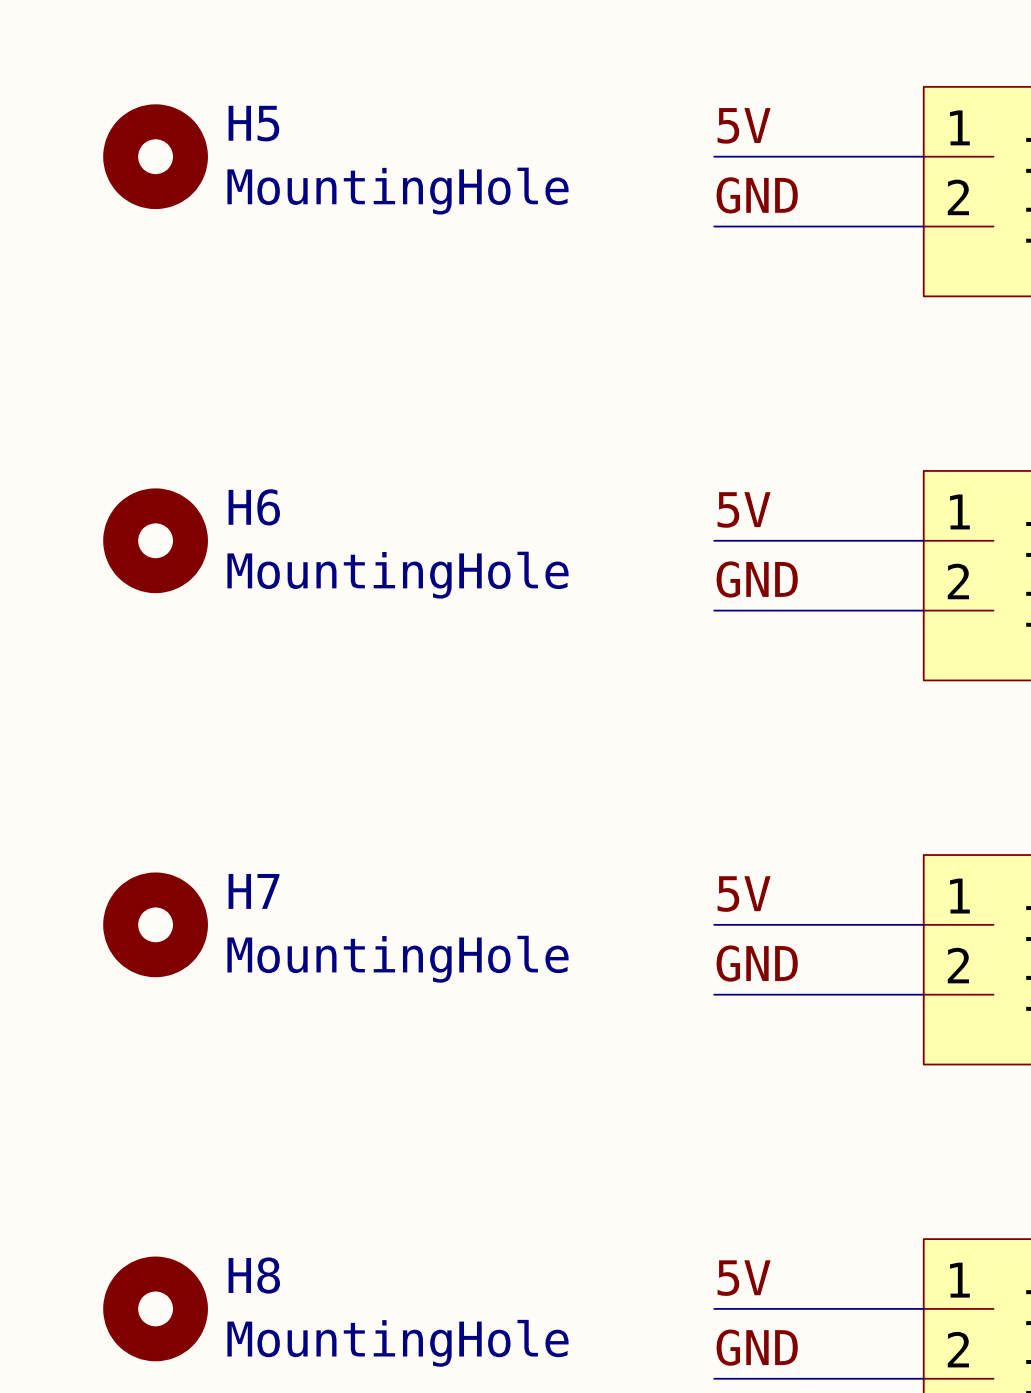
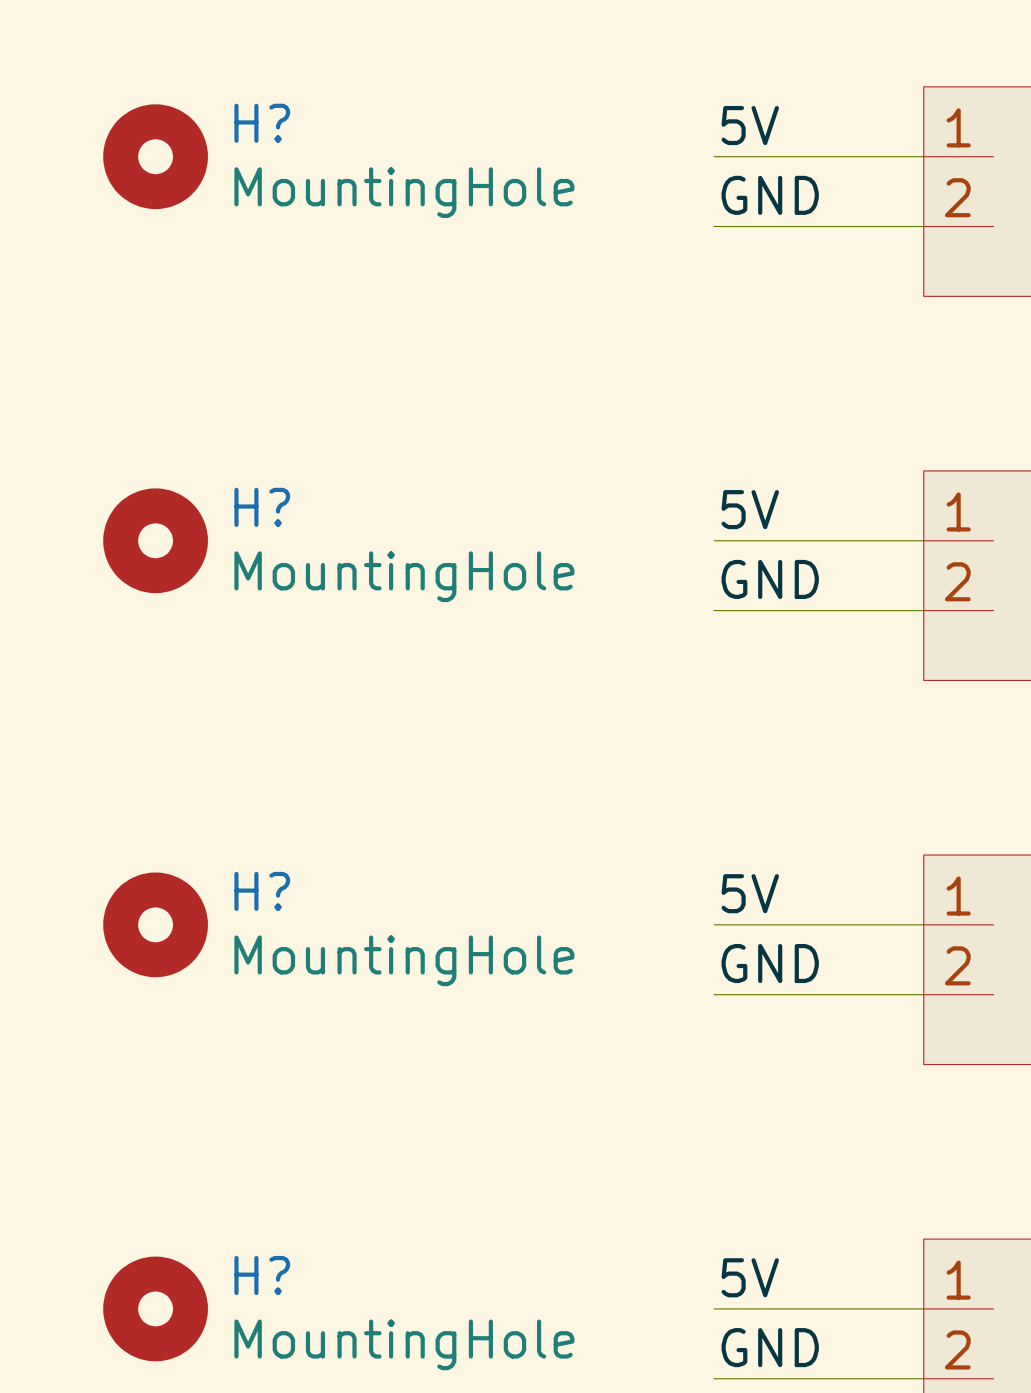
H5 name: H5 (253, 123) -> H? (262, 123)
H6 name: H6 (254, 507) -> H? (262, 507)
H7 name: H7 (254, 891) -> H? (262, 891)
H8 name: H8 (254, 1275) -> H? (262, 1275)

